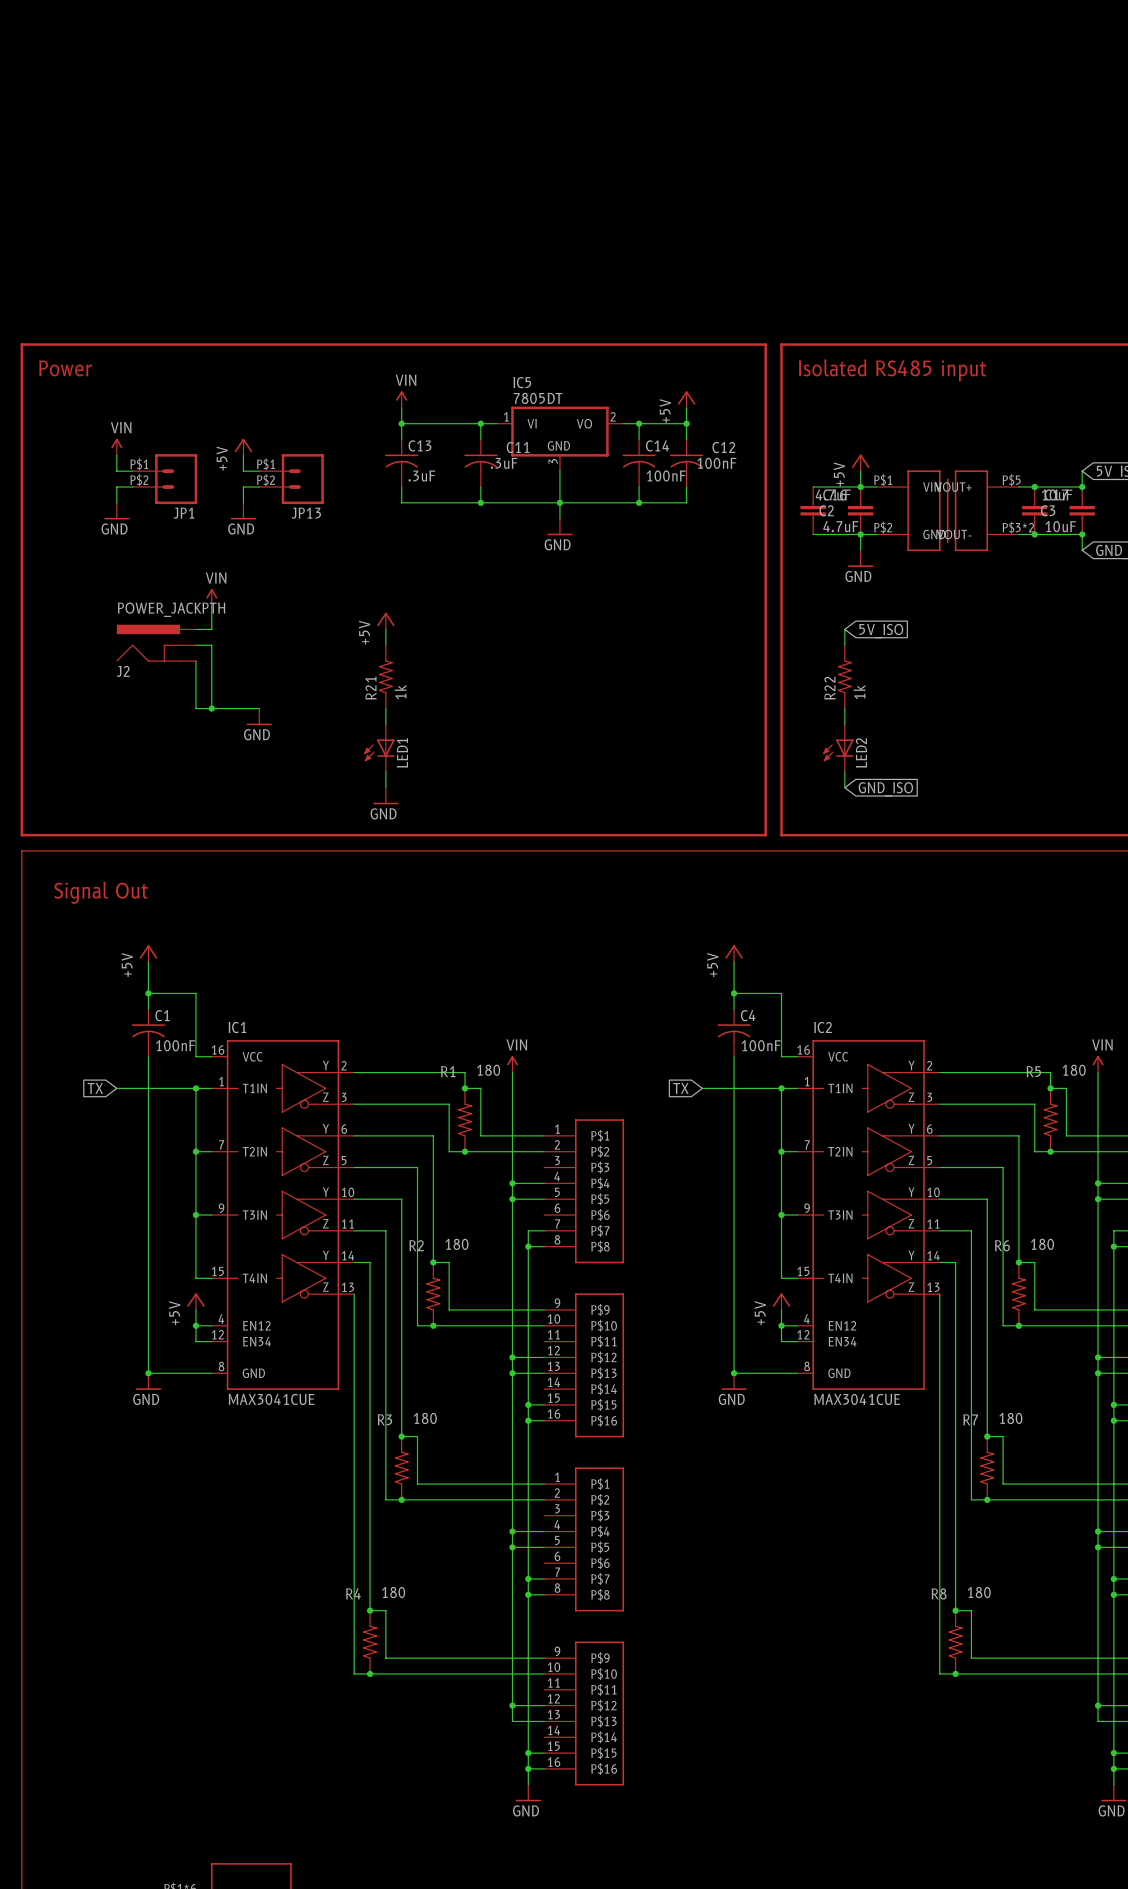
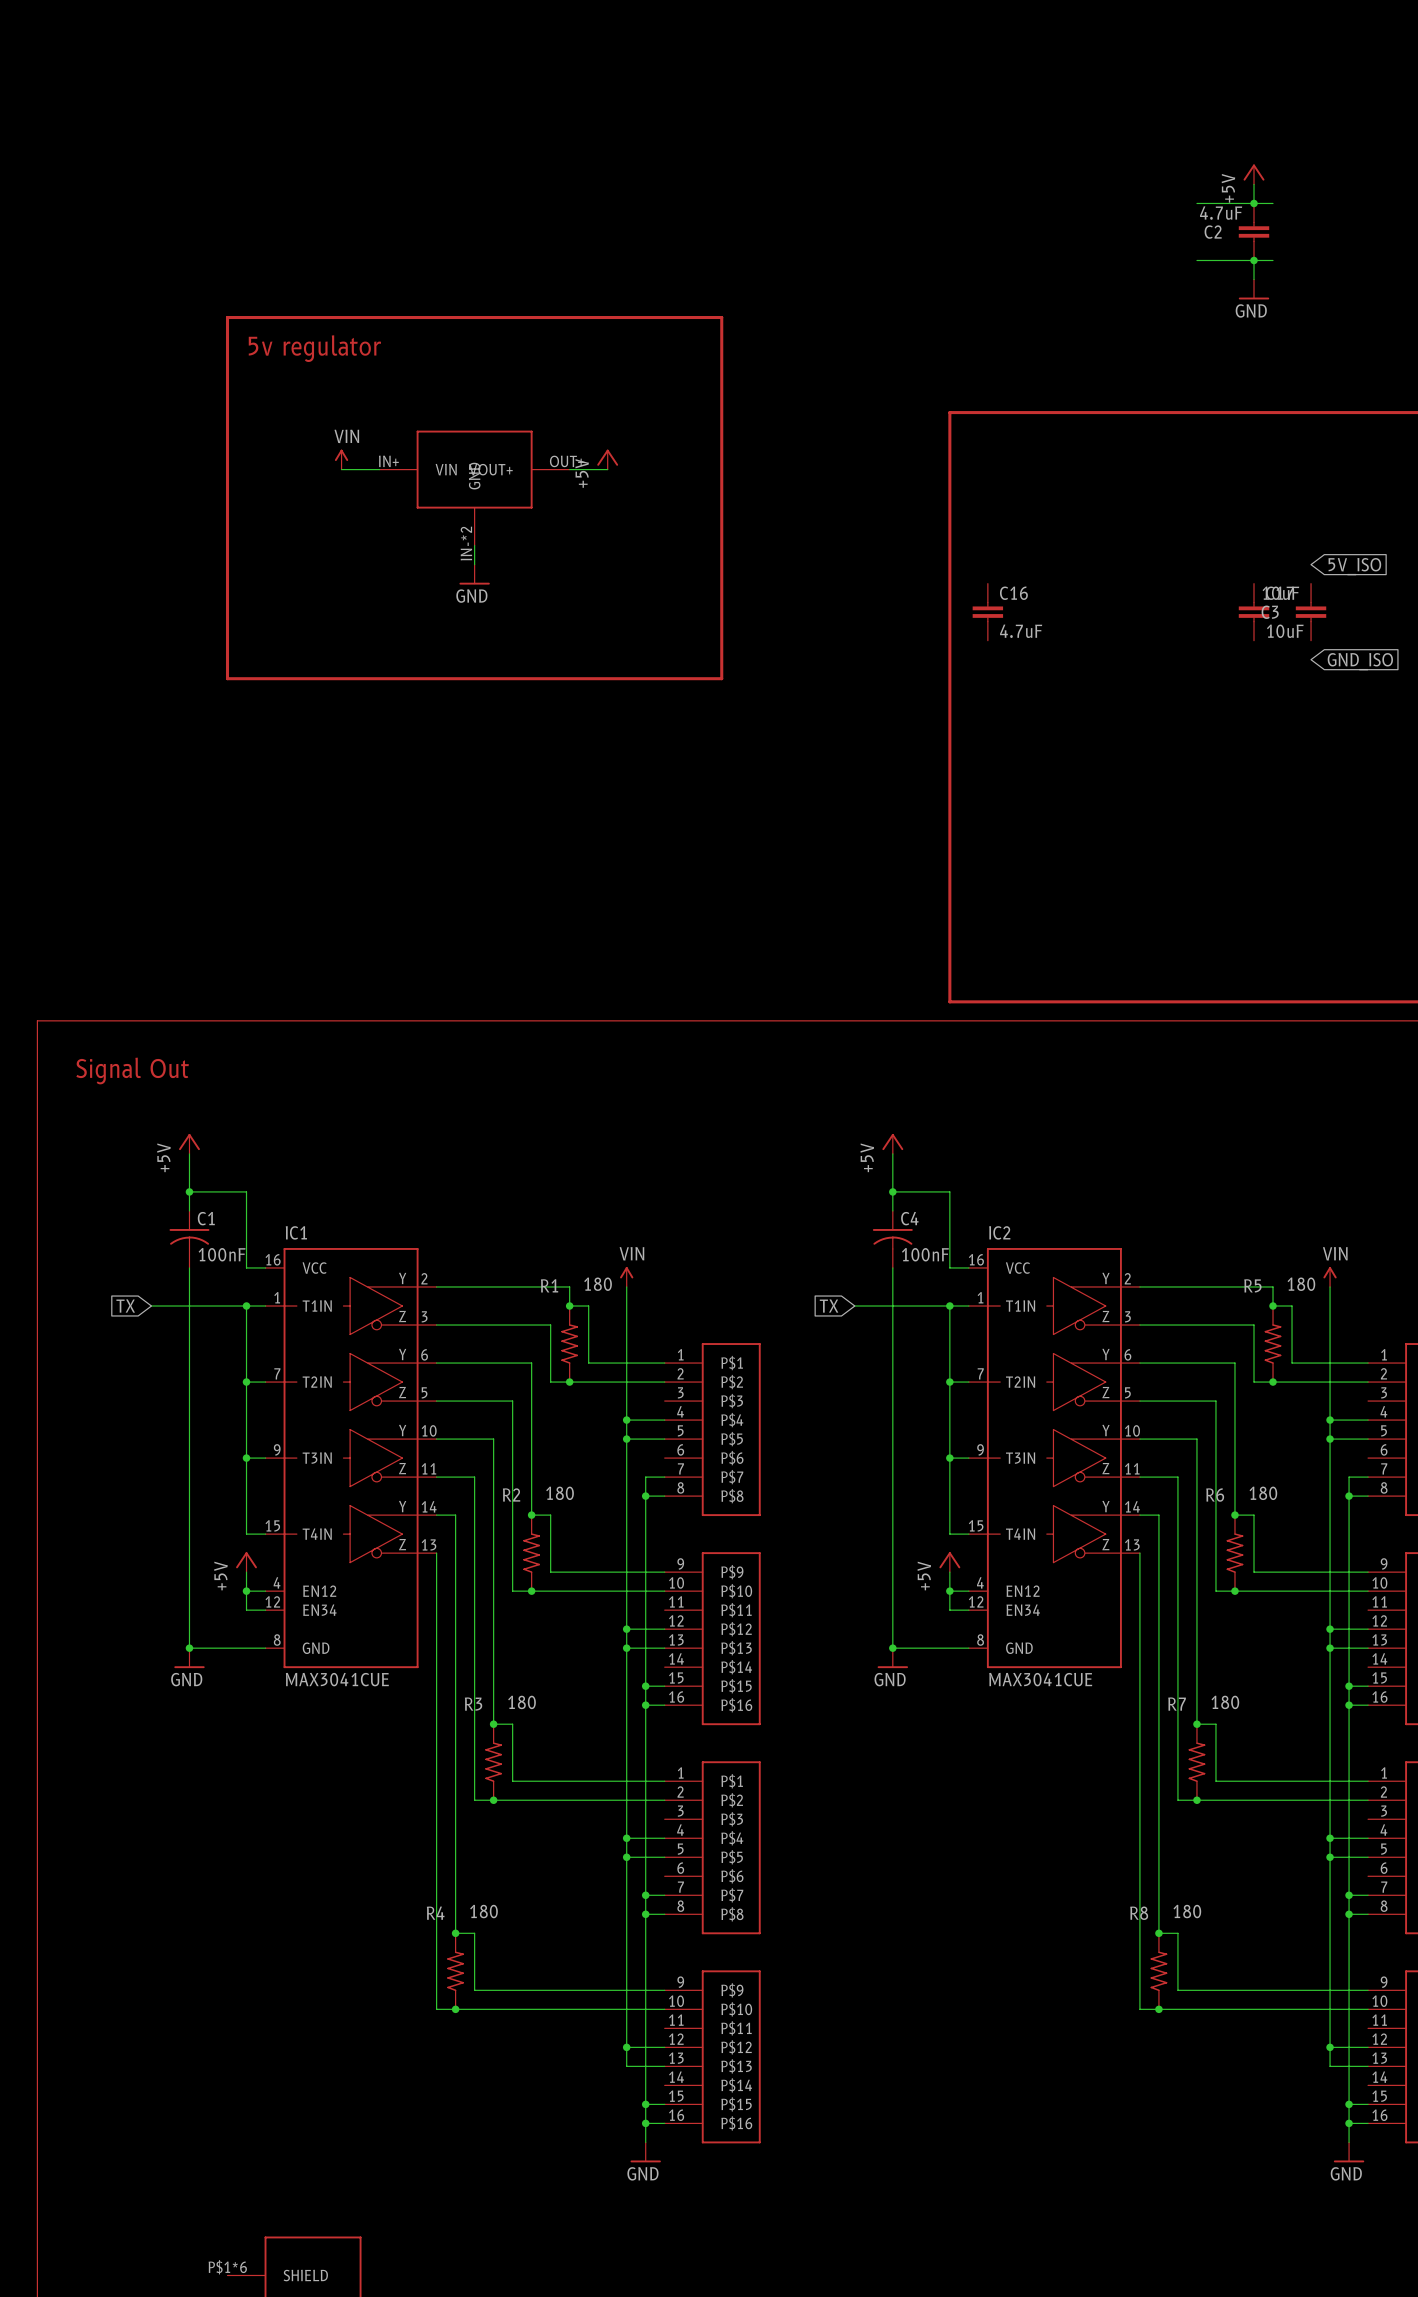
power symbol: none -> +5V (1254, 174)
wire: none -> (1254, 184) (1254, 203)
wire: none -> (1196, 203) (1273, 203)
junction: none -> (1254, 203)
wire: none -> (1196, 260) (1273, 260)
wire: none -> (1254, 260) (1254, 279)
junction: none -> (1254, 260)
power symbol: none -> GND (1254, 289)
line: none -> (227, 317) (721, 317) (721, 678) (227, 678) (227, 317)
text: none -> 5v regulator (314, 348)
line: (21, 344) (765, 344) (765, 835) (21, 835) (21, 344) -> none
text: Power (65, 368) -> none
text: Isolated RS485 input (892, 370) -> none
power symbol: none -> VIN (341, 459)
power symbol: none -> +5V (607, 459)
wire: none -> (341, 469) (379, 469)
wire: none -> (569, 469) (607, 469)
power symbol: VIN (401, 399) -> none
power symbol: +5V (686, 399) -> none
part: none -> (474, 488)
wire: (401, 407) (401, 439) -> none
wire: (686, 407) (686, 439) -> none
wire: (401, 423) (496, 423) -> none
junction: (401, 423) -> none
wire: (480, 423) (480, 439) -> (474, 545) (474, 564)
junction: (480, 423) -> none
wire: (623, 423) (686, 423) -> none
wire: (639, 423) (639, 439) -> none
junction: (639, 423) -> none
junction: (686, 423) -> none
IC5: 7805DT (559, 438) -> none
power symbol: VIN (116, 447) -> none
power symbol: +5V (243, 447) -> none
wire: (116, 455) (116, 471) (132, 471) -> none
wire: (243, 455) (243, 471) (259, 471) -> none
power symbol: +5V (860, 462) -> none
C13: .3uF (401, 463) -> none
C11: .3uF (480, 463) -> none
C14: 100nF (639, 463) -> none
C12: 100nF (686, 463) -> none
wire: (559, 471) (559, 518) -> none
wire: (860, 471) (860, 486) -> none
wire: (1082, 471) (1082, 486) (1018, 486) -> none
JP1: (164, 479) -> none
JP13: (291, 479) -> none
power symbol: none -> GND (474, 574)
wire: (132, 486) (116, 486) (116, 502) -> none
wire: (259, 486) (243, 486) (243, 502) -> none
wire: (401, 486) (401, 502) (686, 502) (686, 486) -> none
wire: (480, 486) (480, 502) -> none
wire: (639, 486) (639, 502) -> none
wire: (813, 486) (876, 486) -> none
junction: (860, 486) -> none
junction: (1034, 486) -> none
junction: (1082, 486) -> none
junction: (480, 502) -> none
junction: (559, 502) -> none
junction: (639, 502) -> none
C2 position: (860, 510) -> (1254, 231)
part: (947, 510) -> none
power symbol: GND (116, 511) -> none
power symbol: GND (243, 511) -> none
power symbol: GND (559, 526) -> none
wire: (813, 534) (876, 534) -> none
wire: (860, 534) (860, 550) -> none
junction: (860, 534) -> none
wire: (1018, 534) (1082, 534) (1082, 550) -> none
junction: (1034, 534) -> none
junction: (1082, 534) -> none
power symbol: GND (860, 558) -> none
power symbol: VIN (211, 597) -> none
wire: (211, 605) (211, 629) (195, 629) -> none
power symbol: +5V (385, 621) -> none
wire: (385, 629) (385, 645) -> none
wire: (844, 629) (844, 645) -> none
global label: 5V_ISO (881, 631) -> none
J2: POWER_JACKPTH (156, 643) -> none
wire: (195, 645) (211, 645) (211, 708) -> none
wire: (195, 661) (195, 708) (259, 708) -> none
R21: 1k (385, 676) -> none
R22: 1k (844, 676) -> none
junction: (211, 708) -> none
wire: (385, 708) (385, 724) -> none
wire: (844, 708) (844, 724) -> none
power symbol: GND (259, 716) -> none
LED1: (379, 748) -> none
LED2: (838, 748) -> none
wire: (385, 771) (385, 787) -> none
wire: (844, 771) (844, 787) -> none
global label: GND_ISO (885, 789) -> none
power symbol: GND (385, 796) -> none

